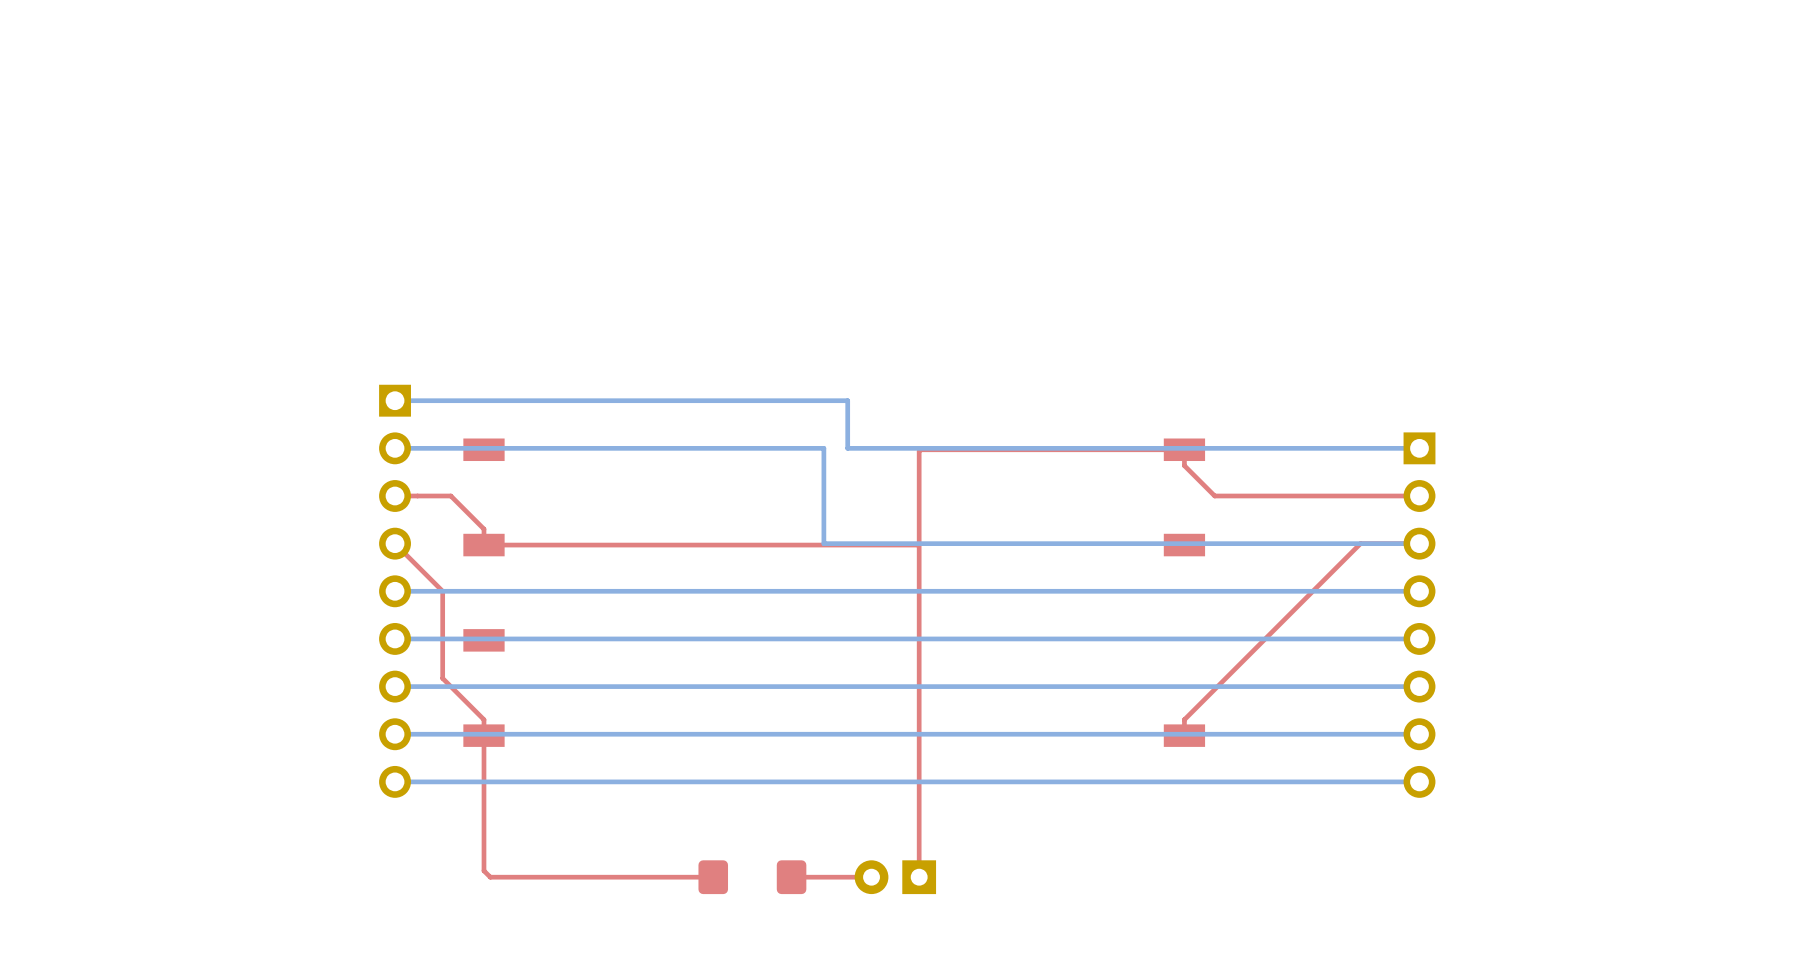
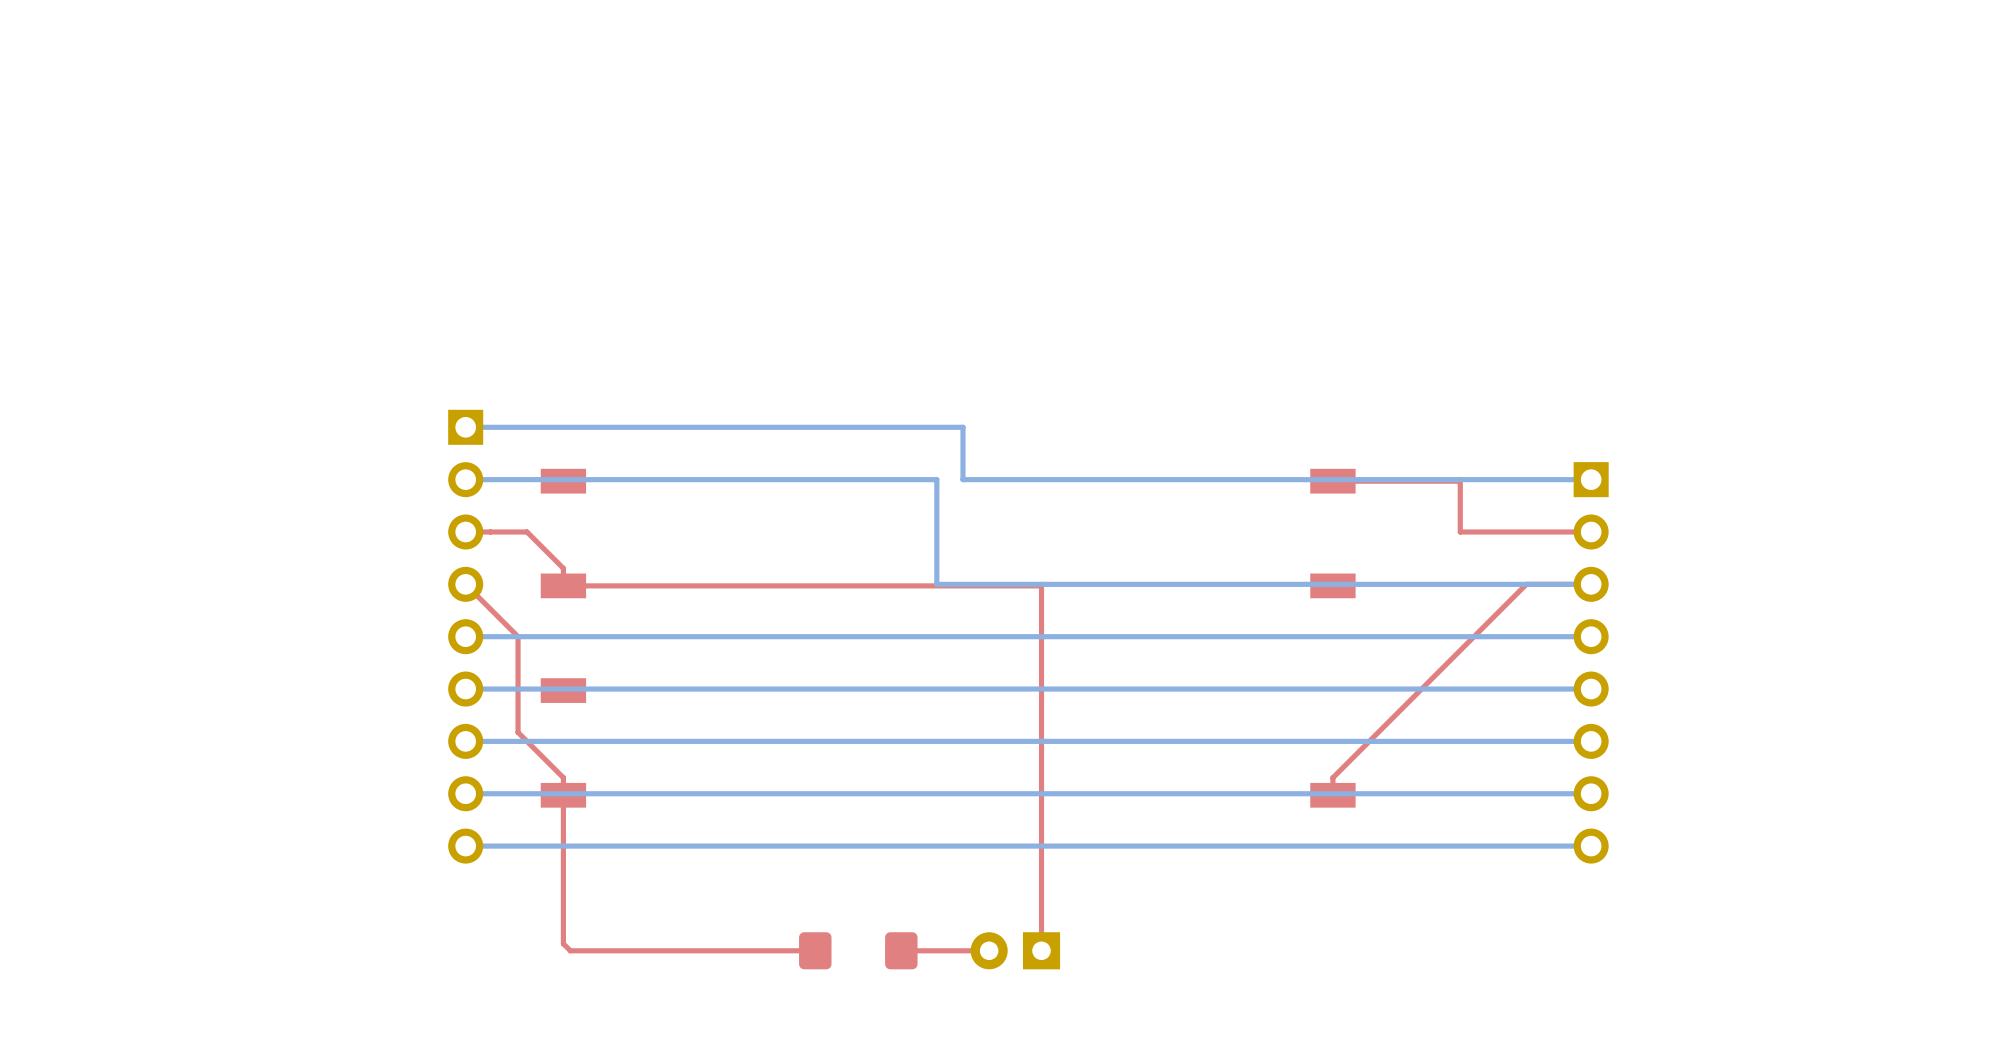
top track: (1300, 495) (1214, 495) (1184, 465) (1184, 449) (920, 449) (919, 543) -> (1460, 532) (1460, 479) (1458, 481) (1332, 481)

